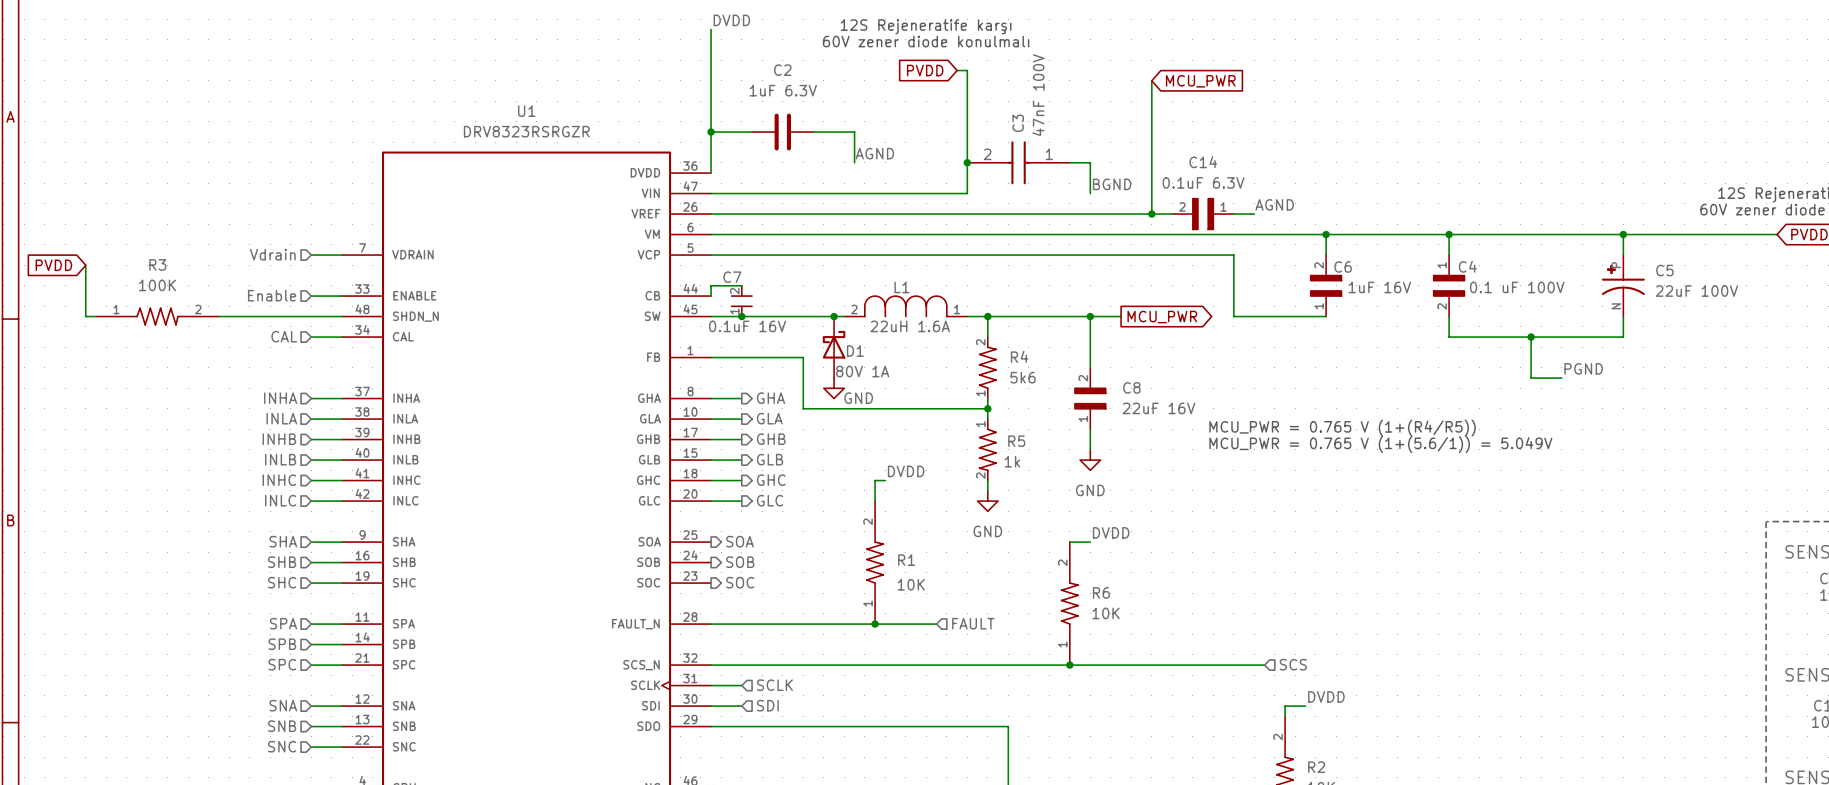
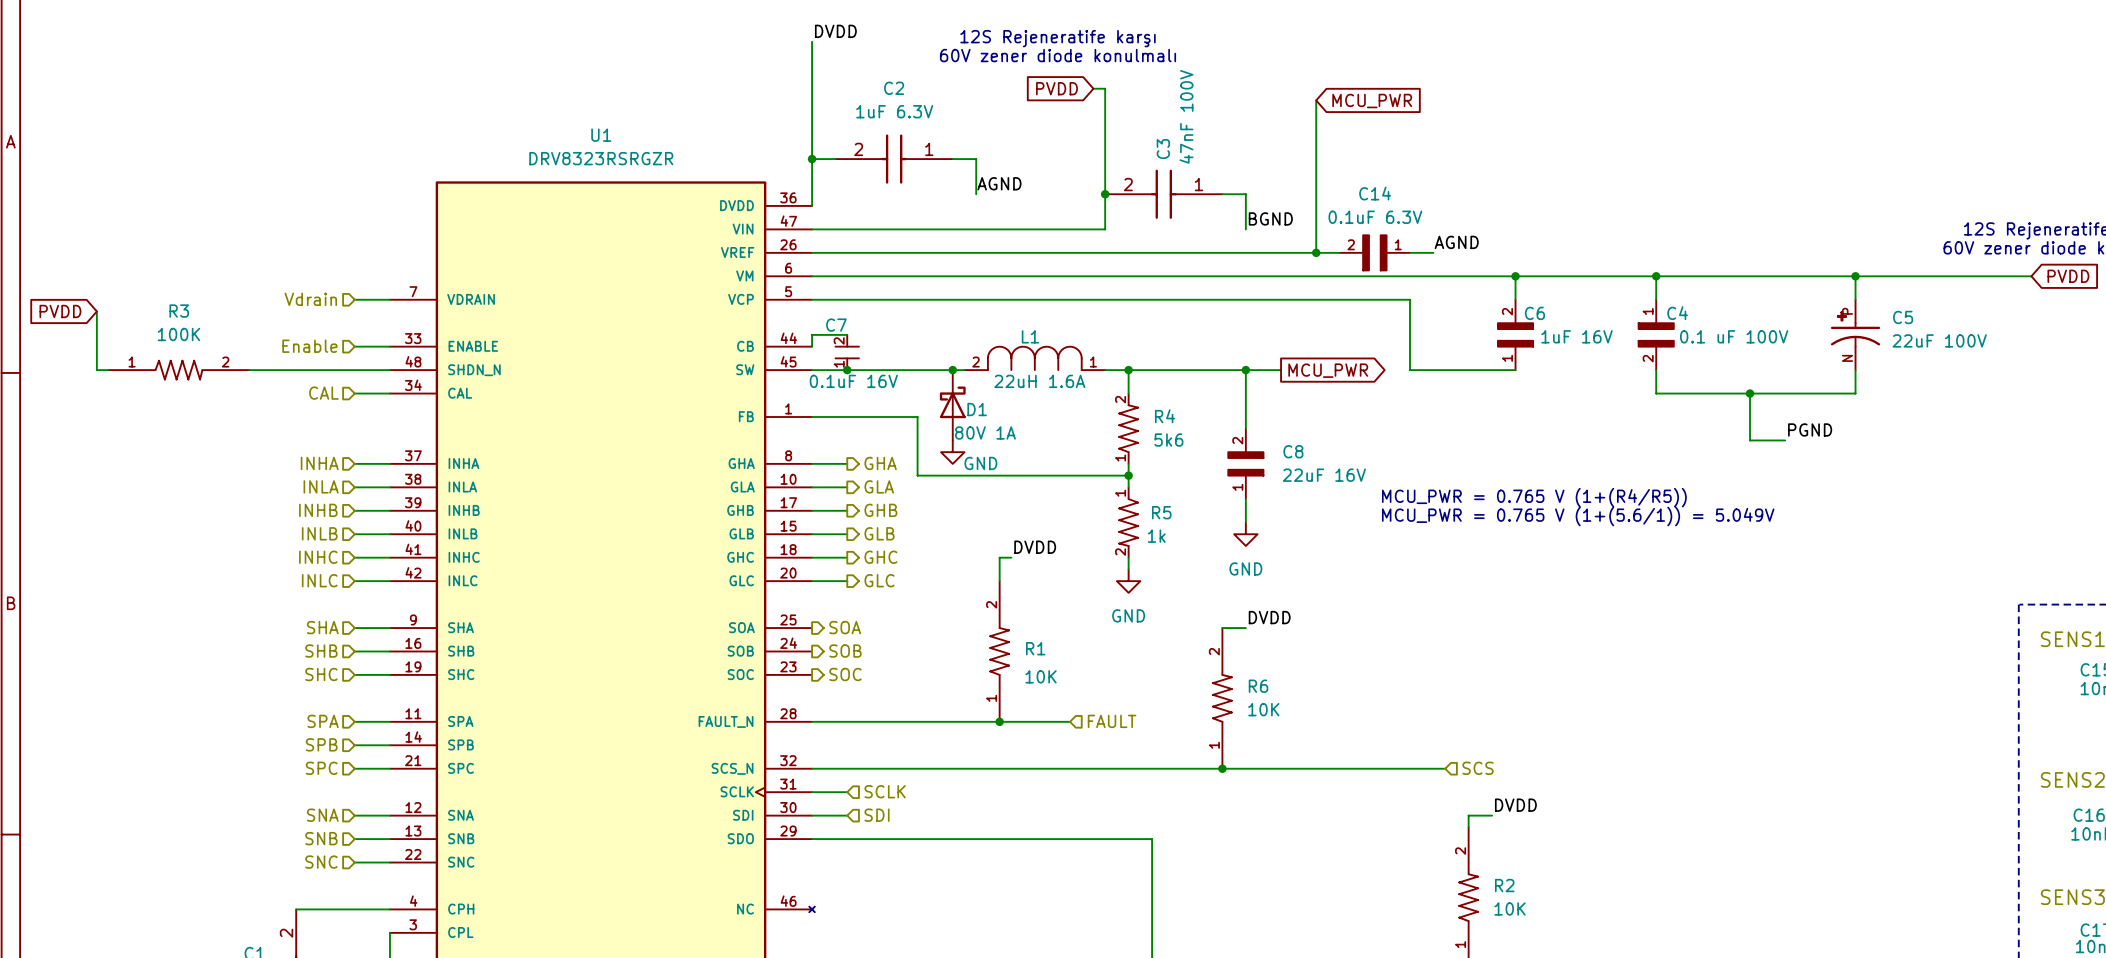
C2 symbol: [752, 113, 814, 151] -> [835, 134, 953, 184]

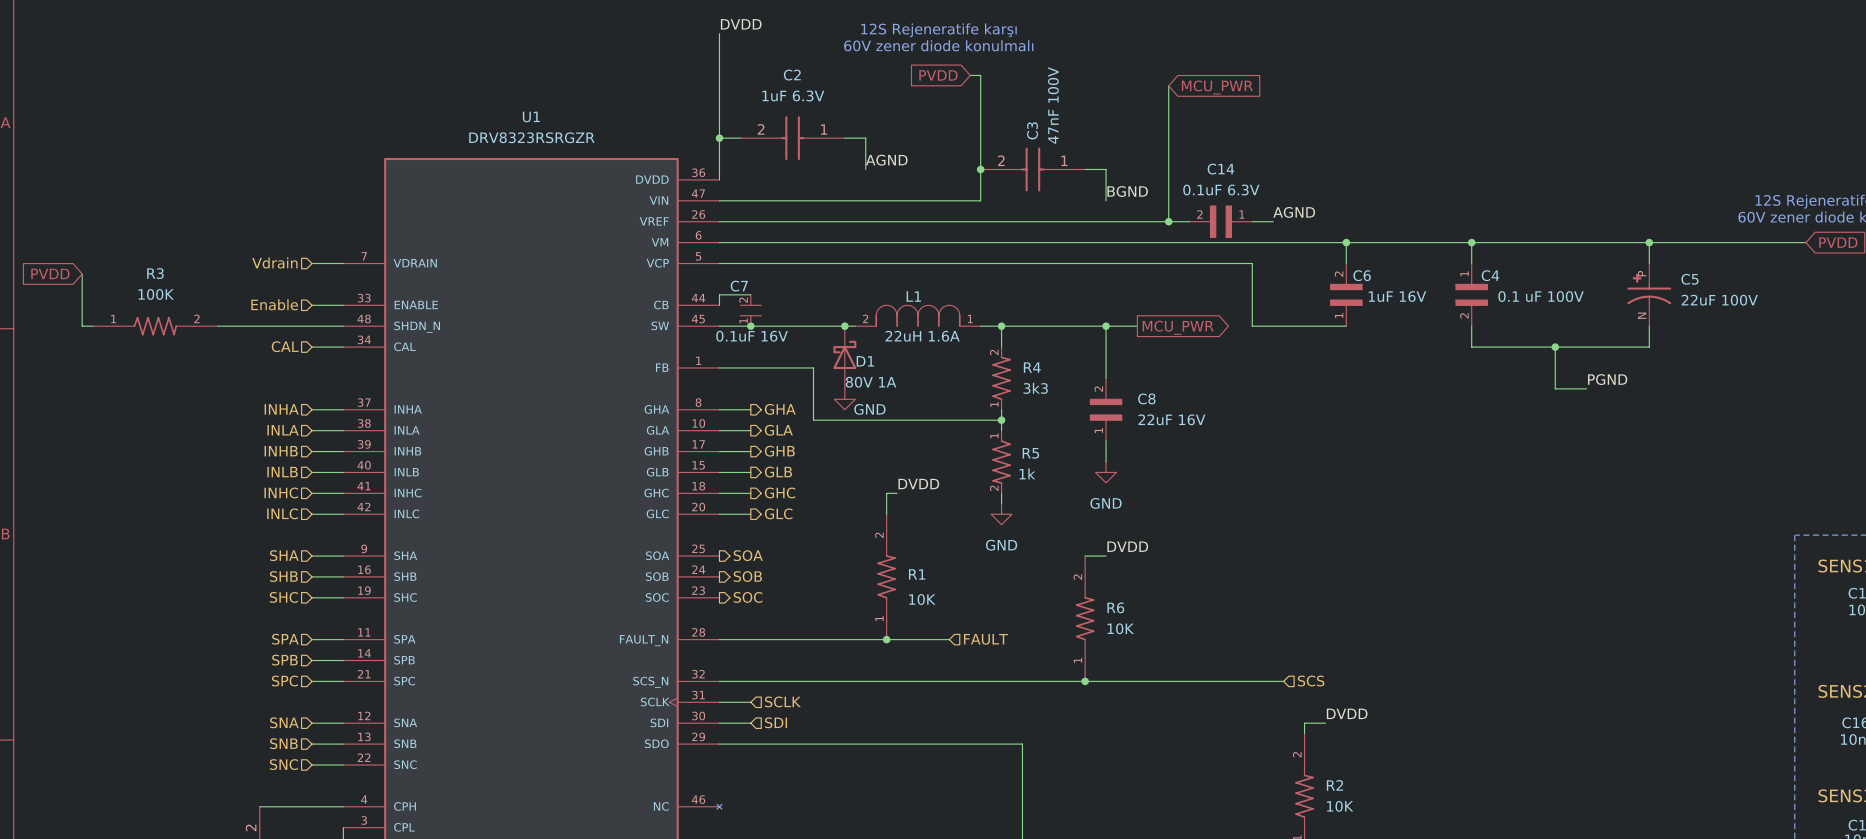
R4 value: 5k6 (1168, 440) -> 3k3 (1035, 388)
text: MCU_PWR = 0.765 V (1+(R4/R5)) (1534, 497) -> none
text: MCU_PWR = 0.765 V (1+(5.6/1)) = 5.049V (1578, 516) -> none

